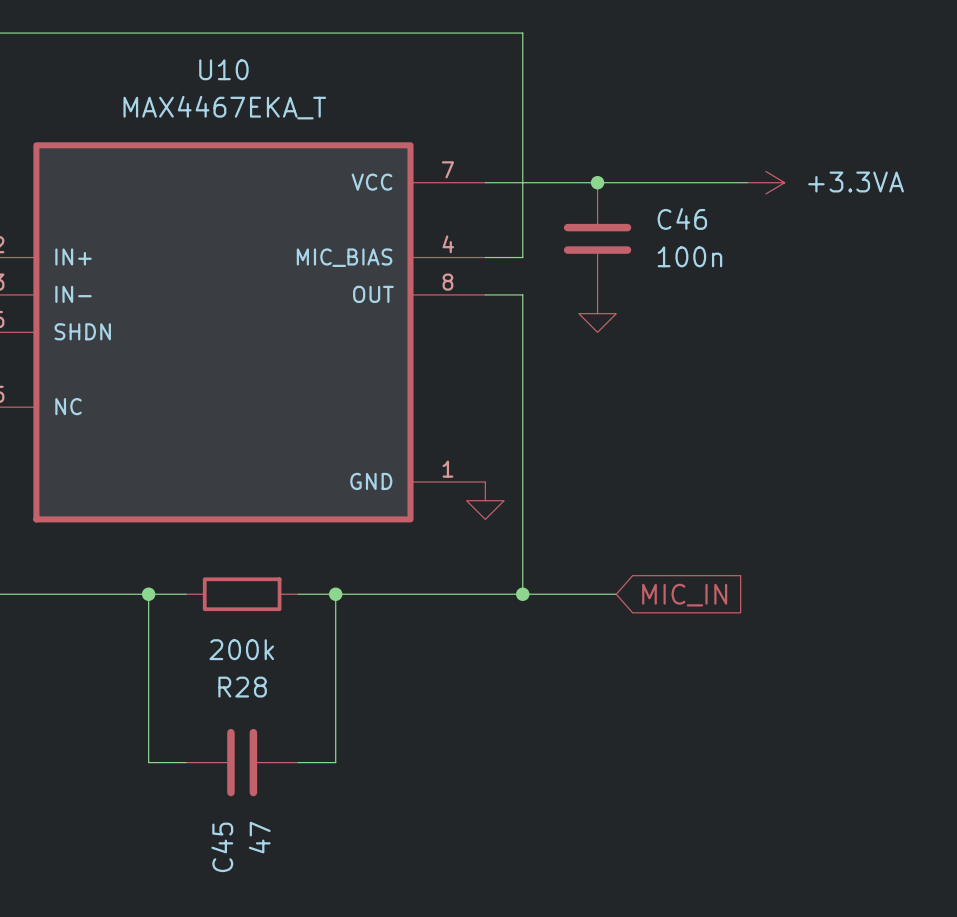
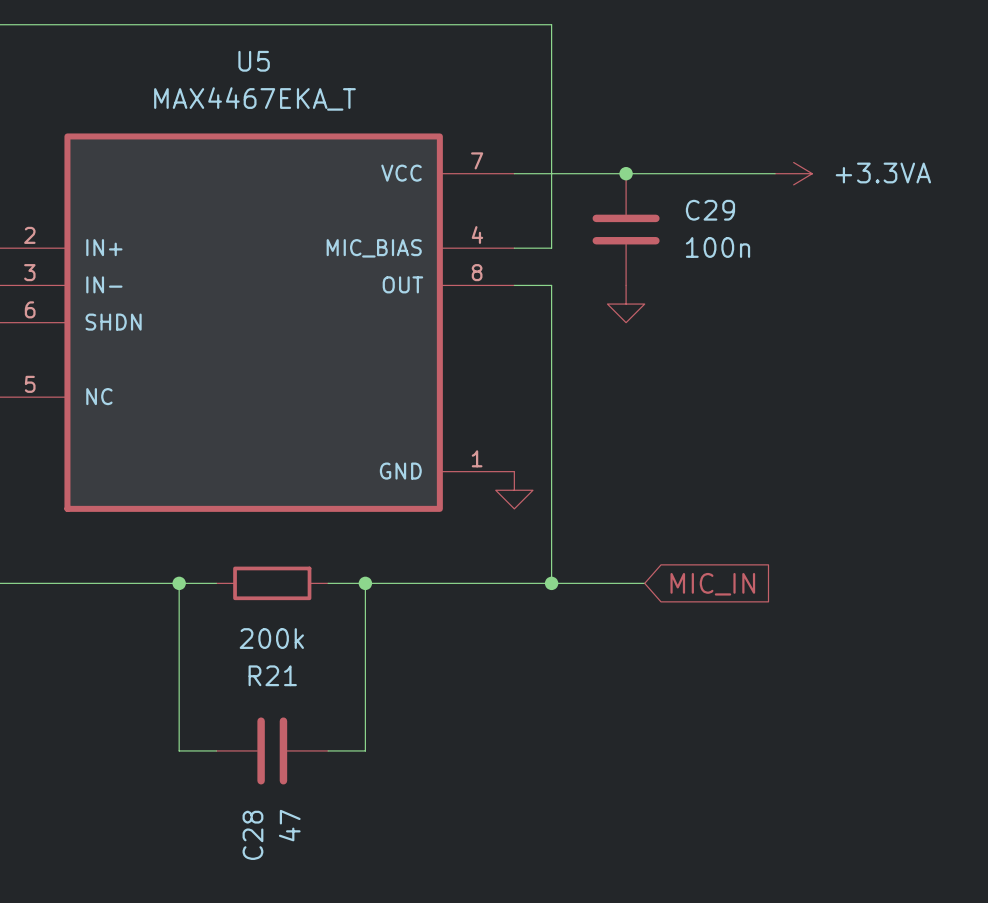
U10 name: U10 (223, 69) -> U5 (254, 61)
C46 name: C46 (682, 218) -> C29 (710, 210)
R28 name: R28 (242, 687) -> R21 (272, 675)
C45 name: C45 (222, 847) -> C28 (252, 835)

